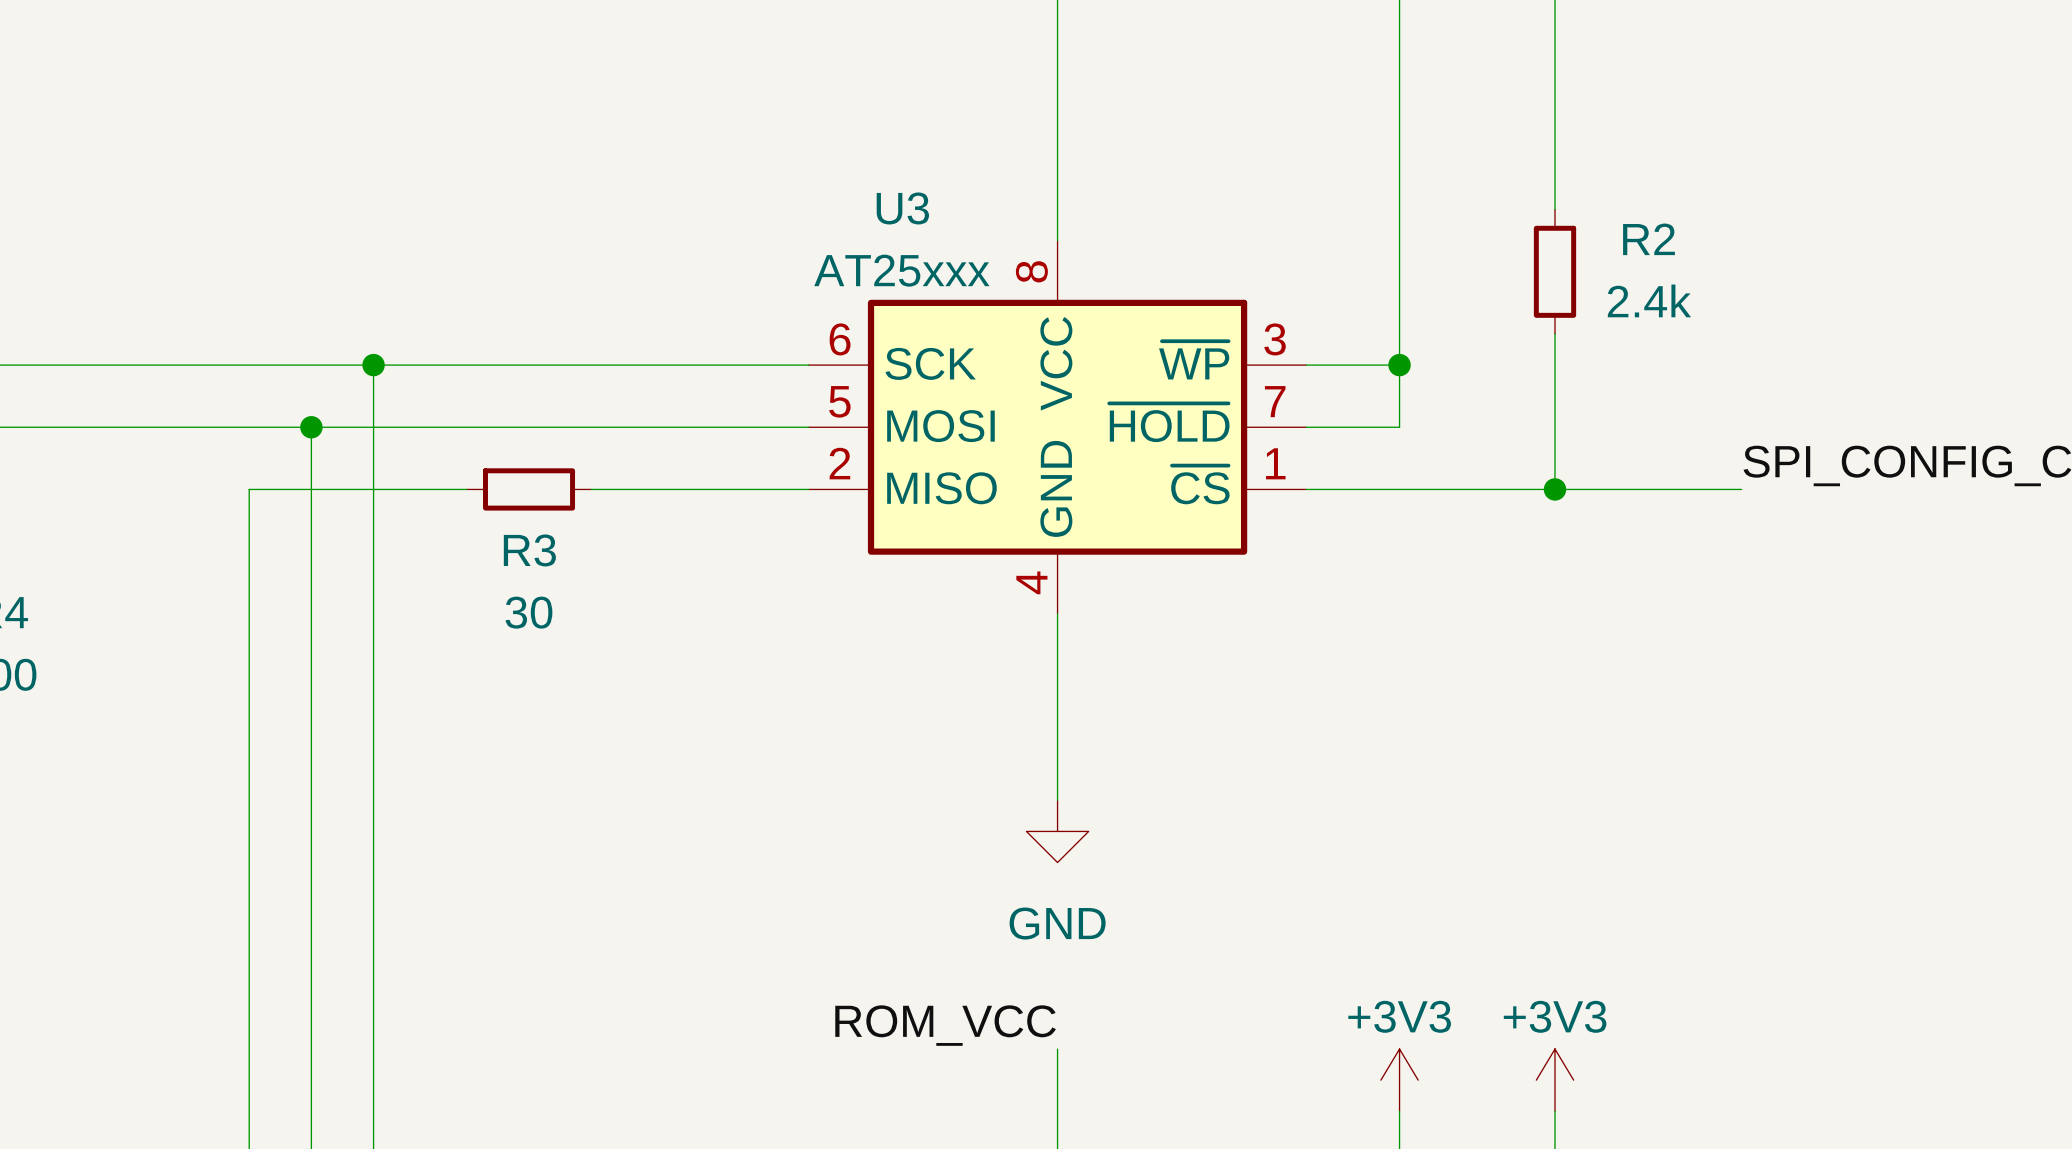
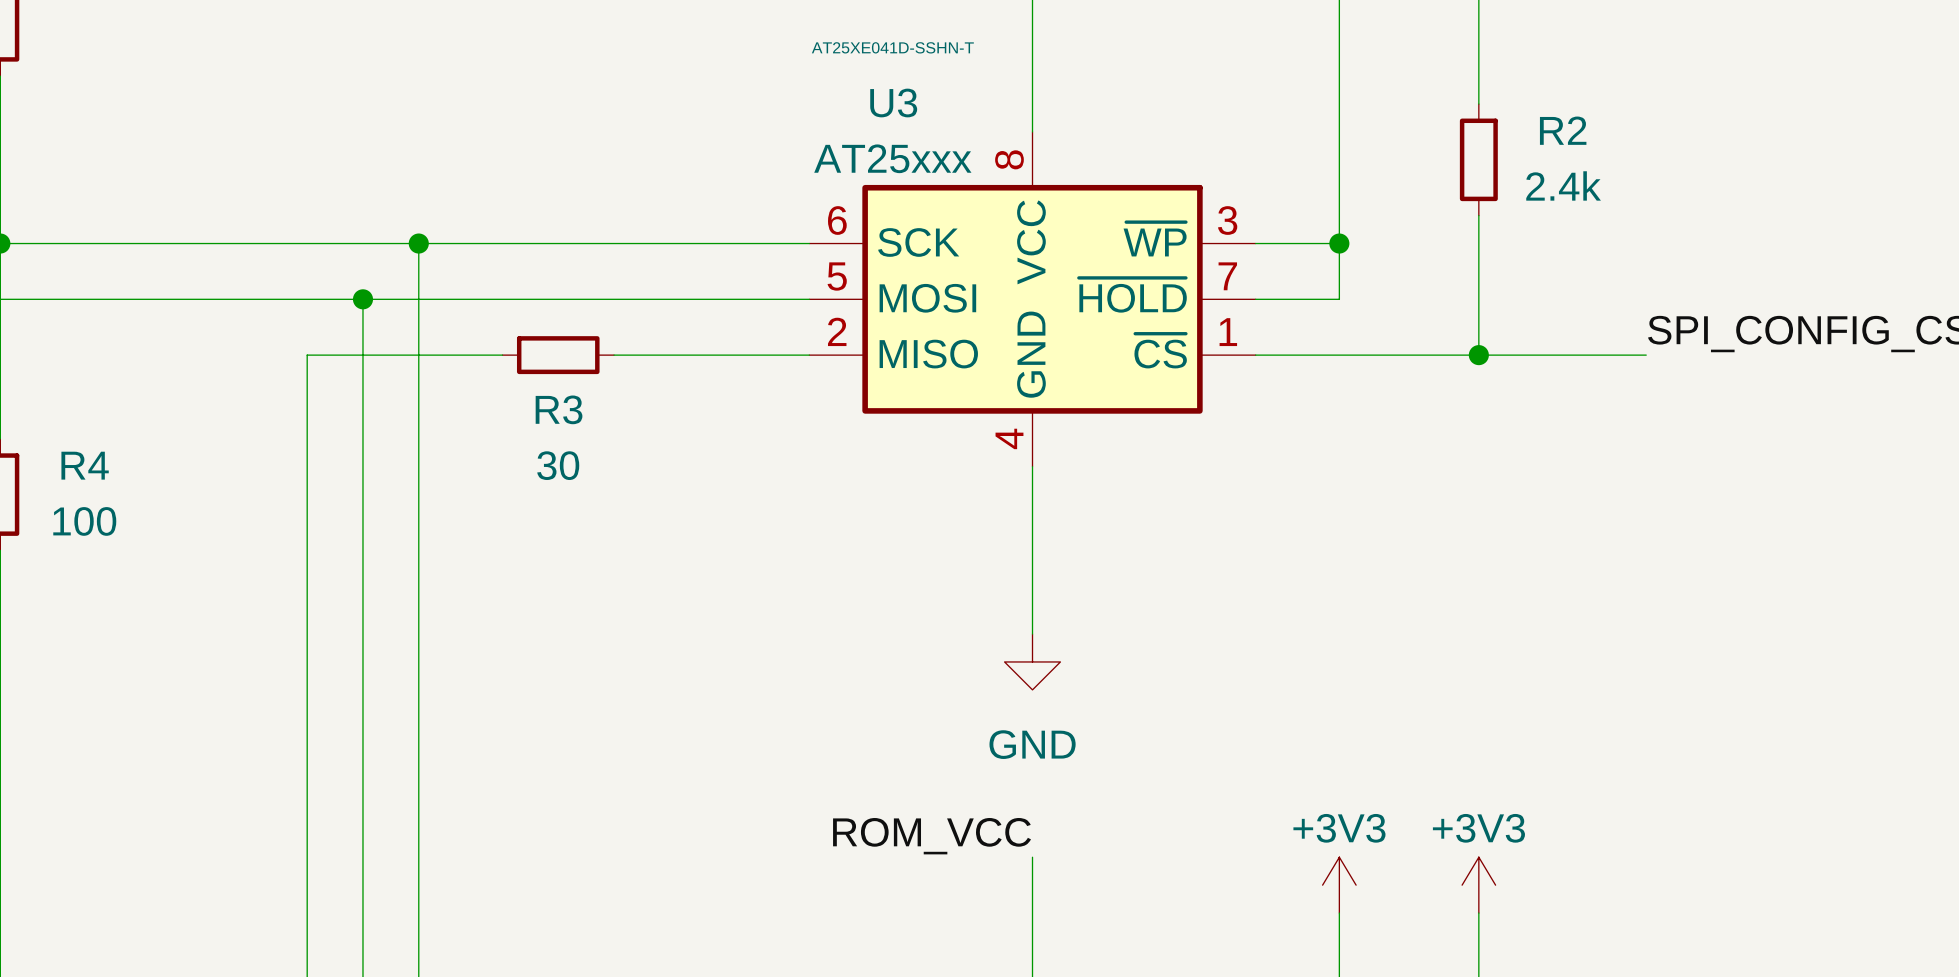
U3 text: none -> AT25XE041D-SSHN-T (892, 47)

